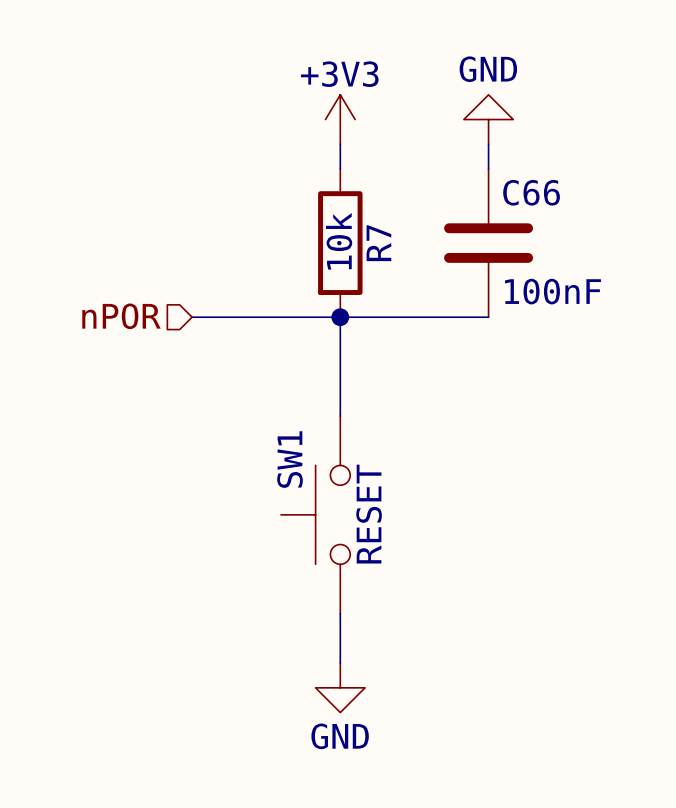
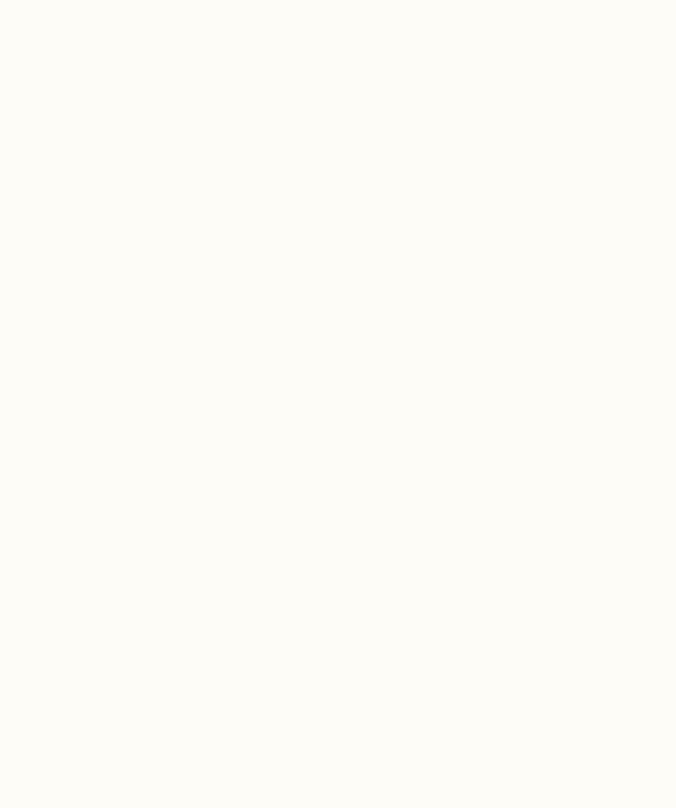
power symbol: +3V3 (340, 119) -> none
power symbol: GND (488, 119) -> none
wire: (340, 144) (340, 168) -> none
wire: (488, 144) (488, 168) -> none
R7: 10k (340, 243) -> none
C66: 100nF (488, 243) -> none
hierarchical label: nPOR (121, 316) -> none
wire: (192, 317) (488, 317) -> none
wire: (340, 317) (340, 416) -> none
junction: (340, 317) -> none
SW1: RESET (315, 514) -> none
wire: (340, 613) (340, 663) -> none
power symbol: GND (340, 687) -> none

